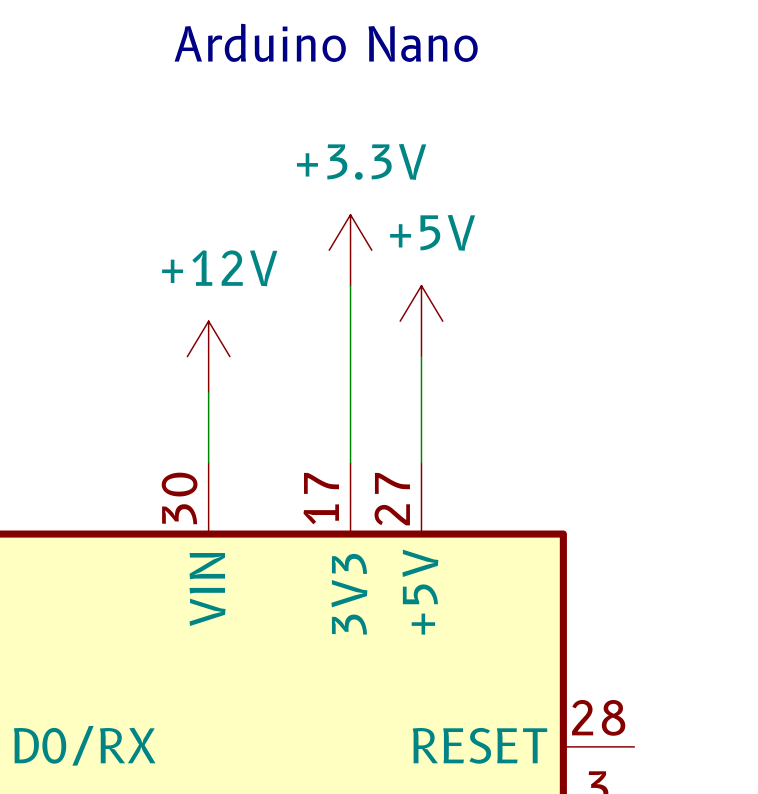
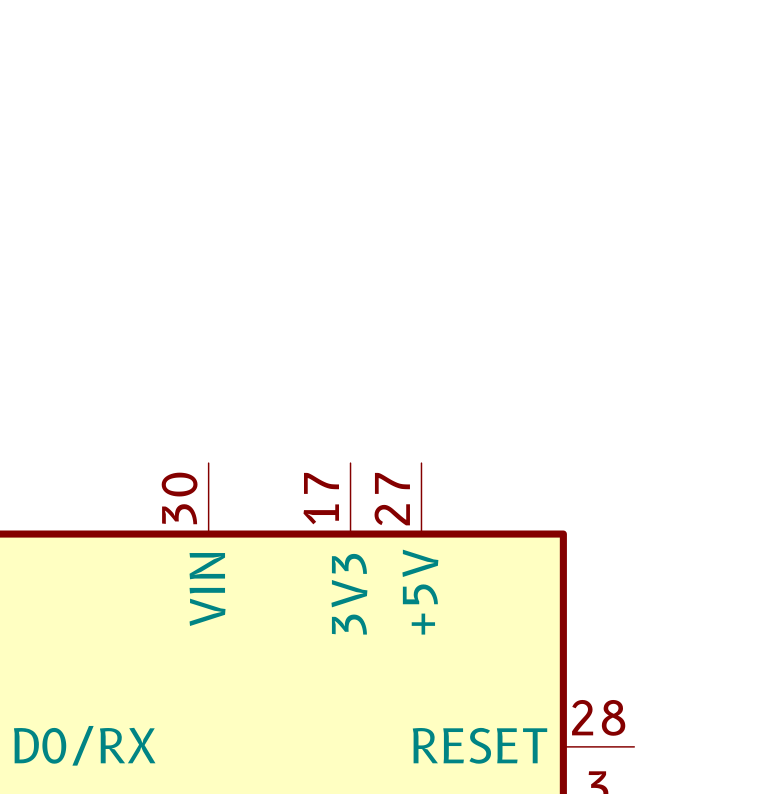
text: Arduino Nano (326, 42) -> none
power symbol: +3.3V (350, 250) -> none
wire: (350, 285) (350, 463) -> none
power symbol: +5V (421, 321) -> none
power symbol: +12V (208, 356) -> none
wire: (421, 356) (421, 463) -> none
wire: (208, 392) (208, 463) -> none

